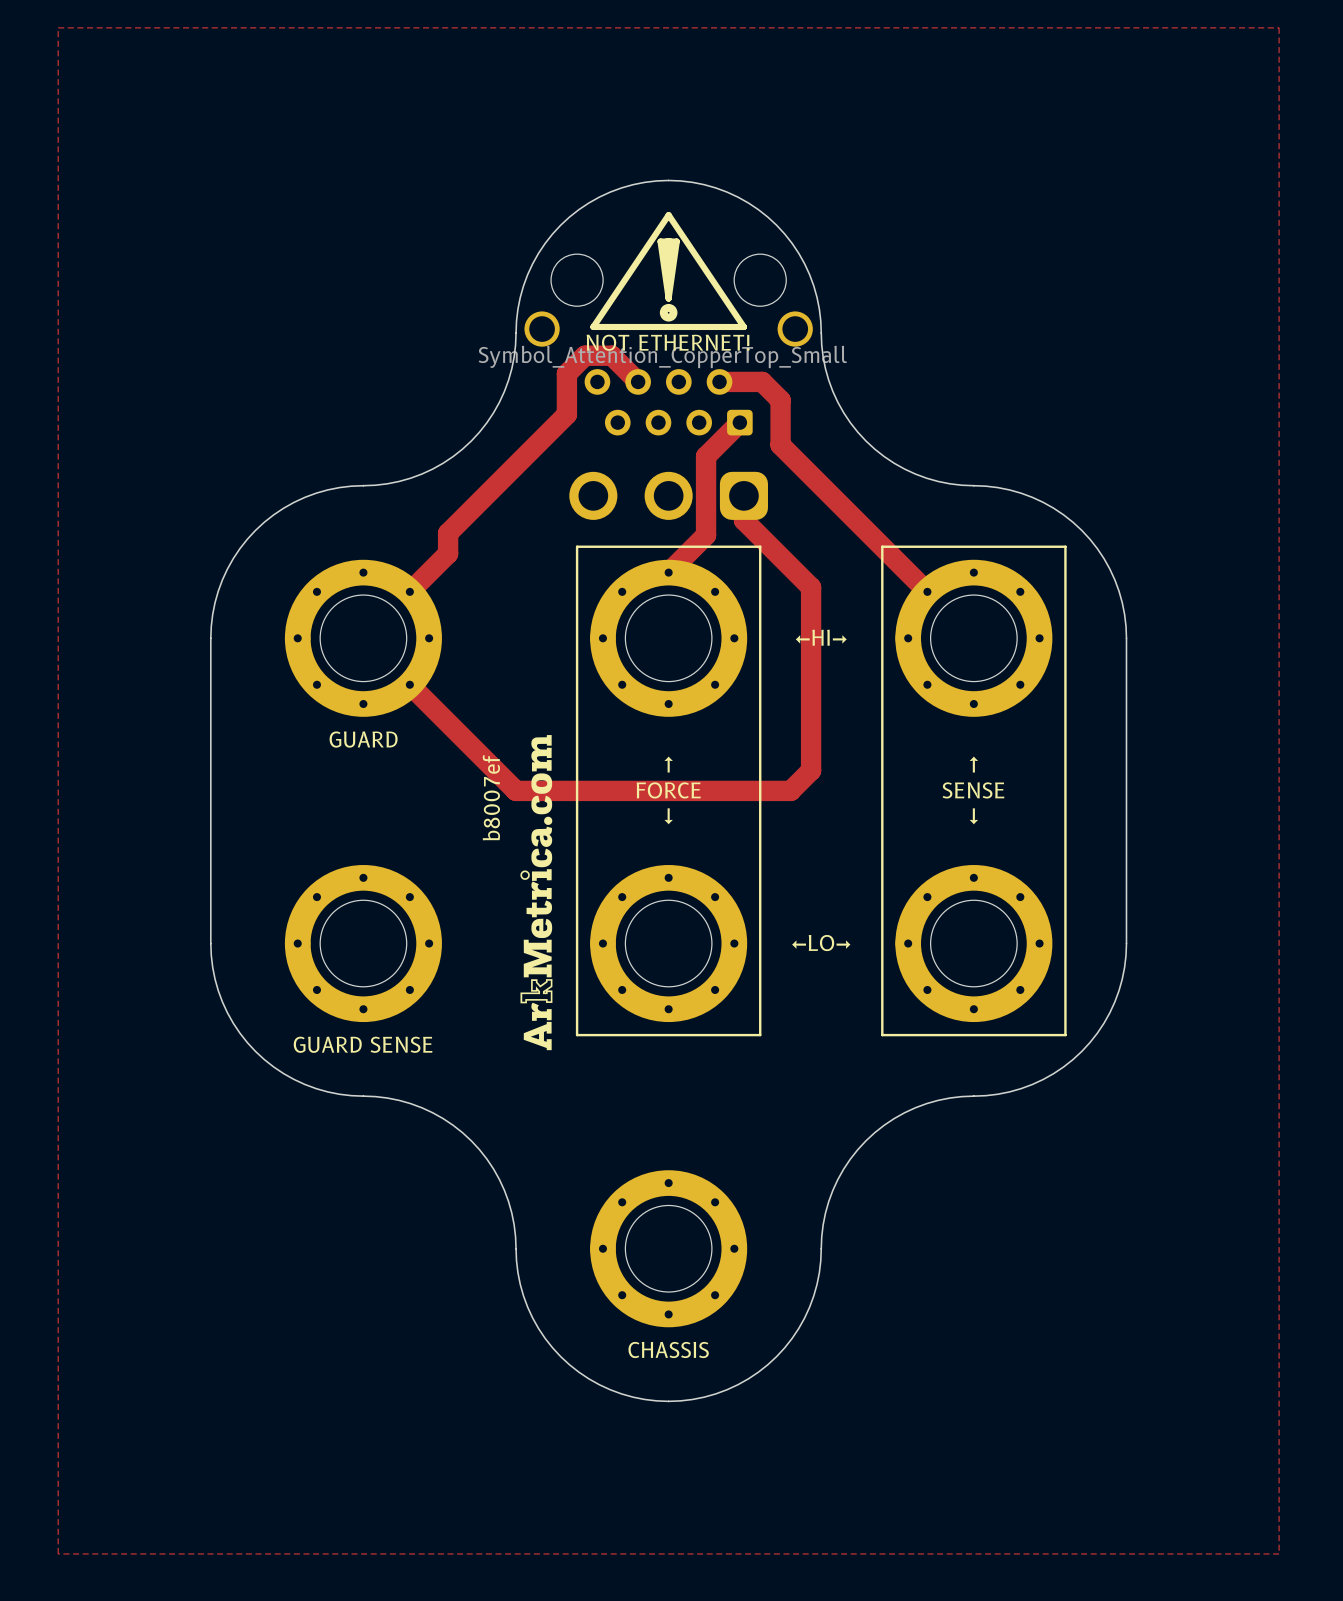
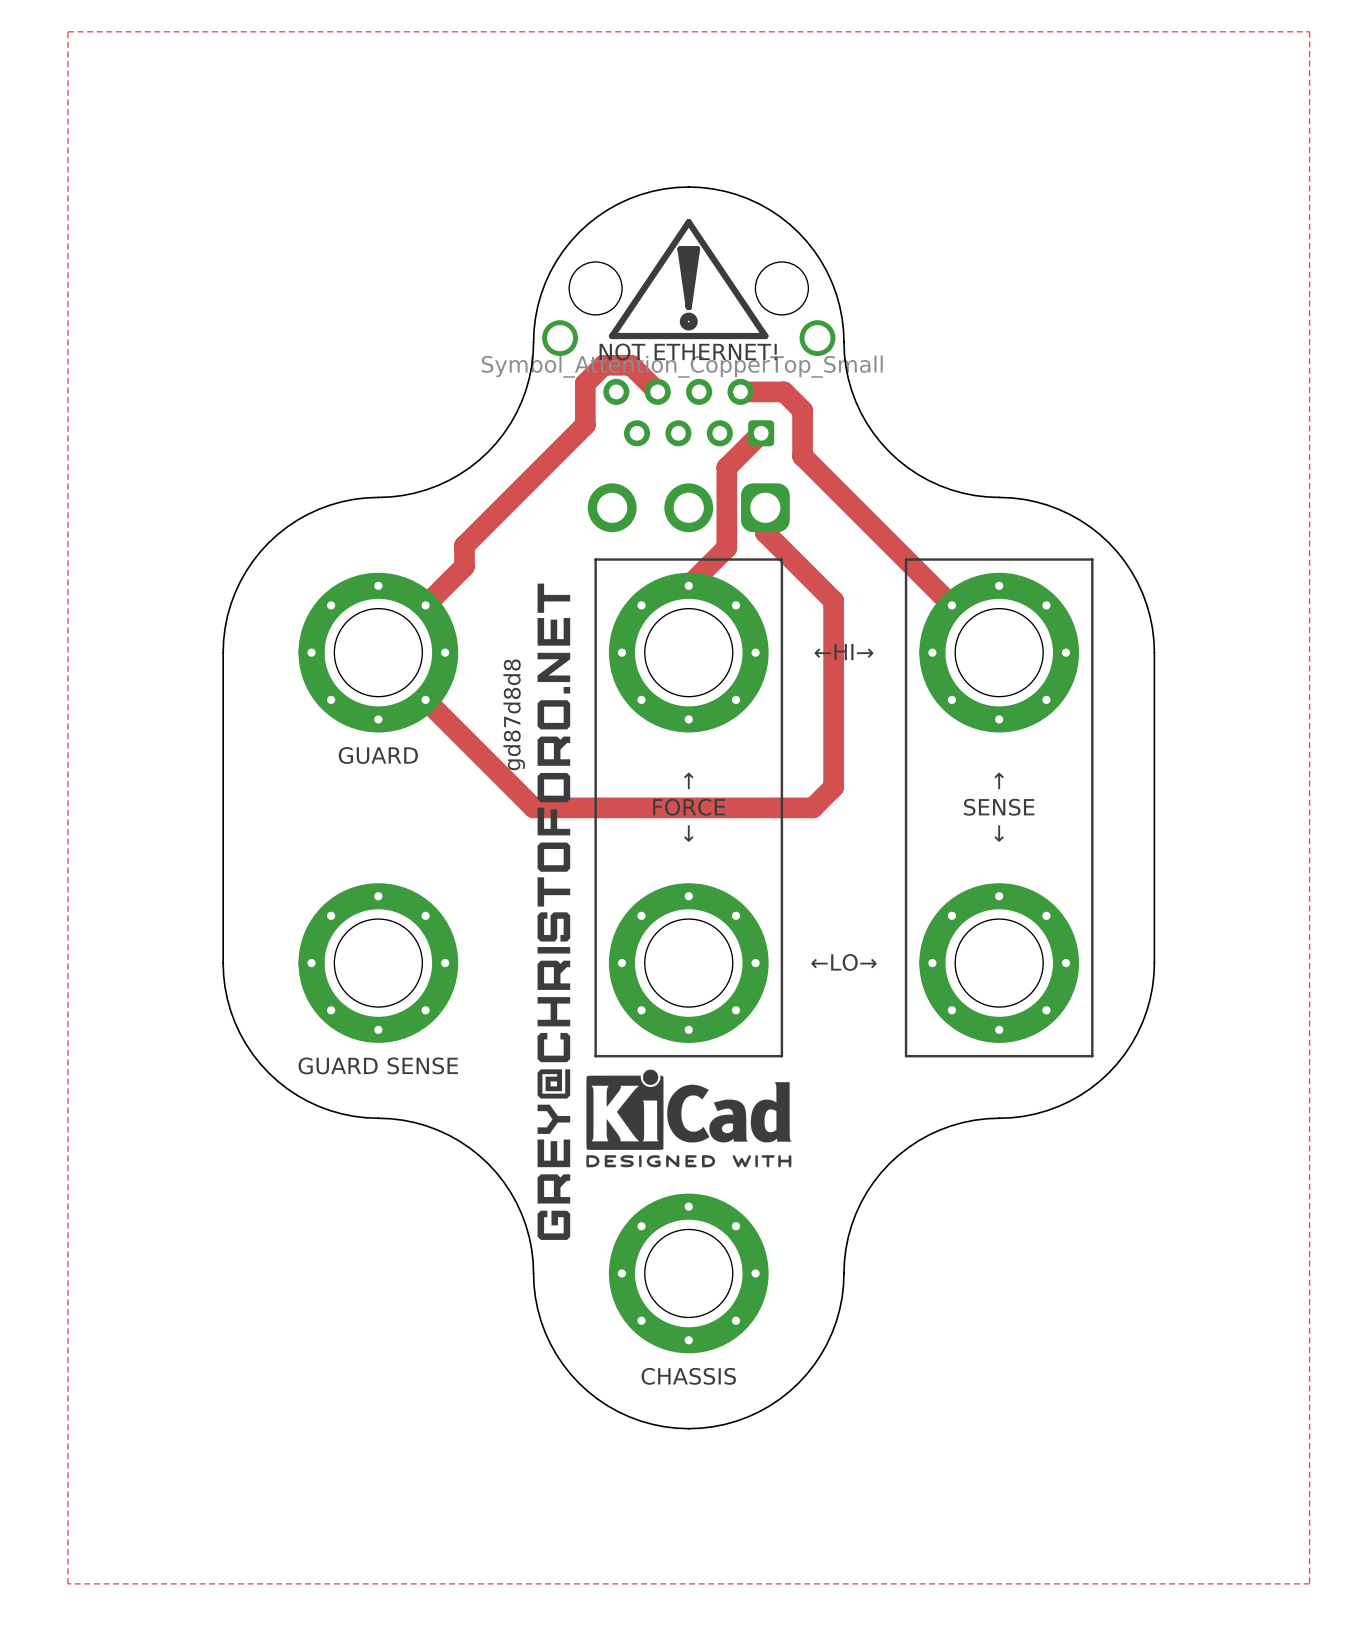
text: none -> gd87d8d8 (514, 714)
drawing shape: [520, 735, 553, 1051] -> [537, 583, 571, 1240]
text: b8007ef (491, 797) -> none
drawing: none -> [586, 1069, 792, 1168]

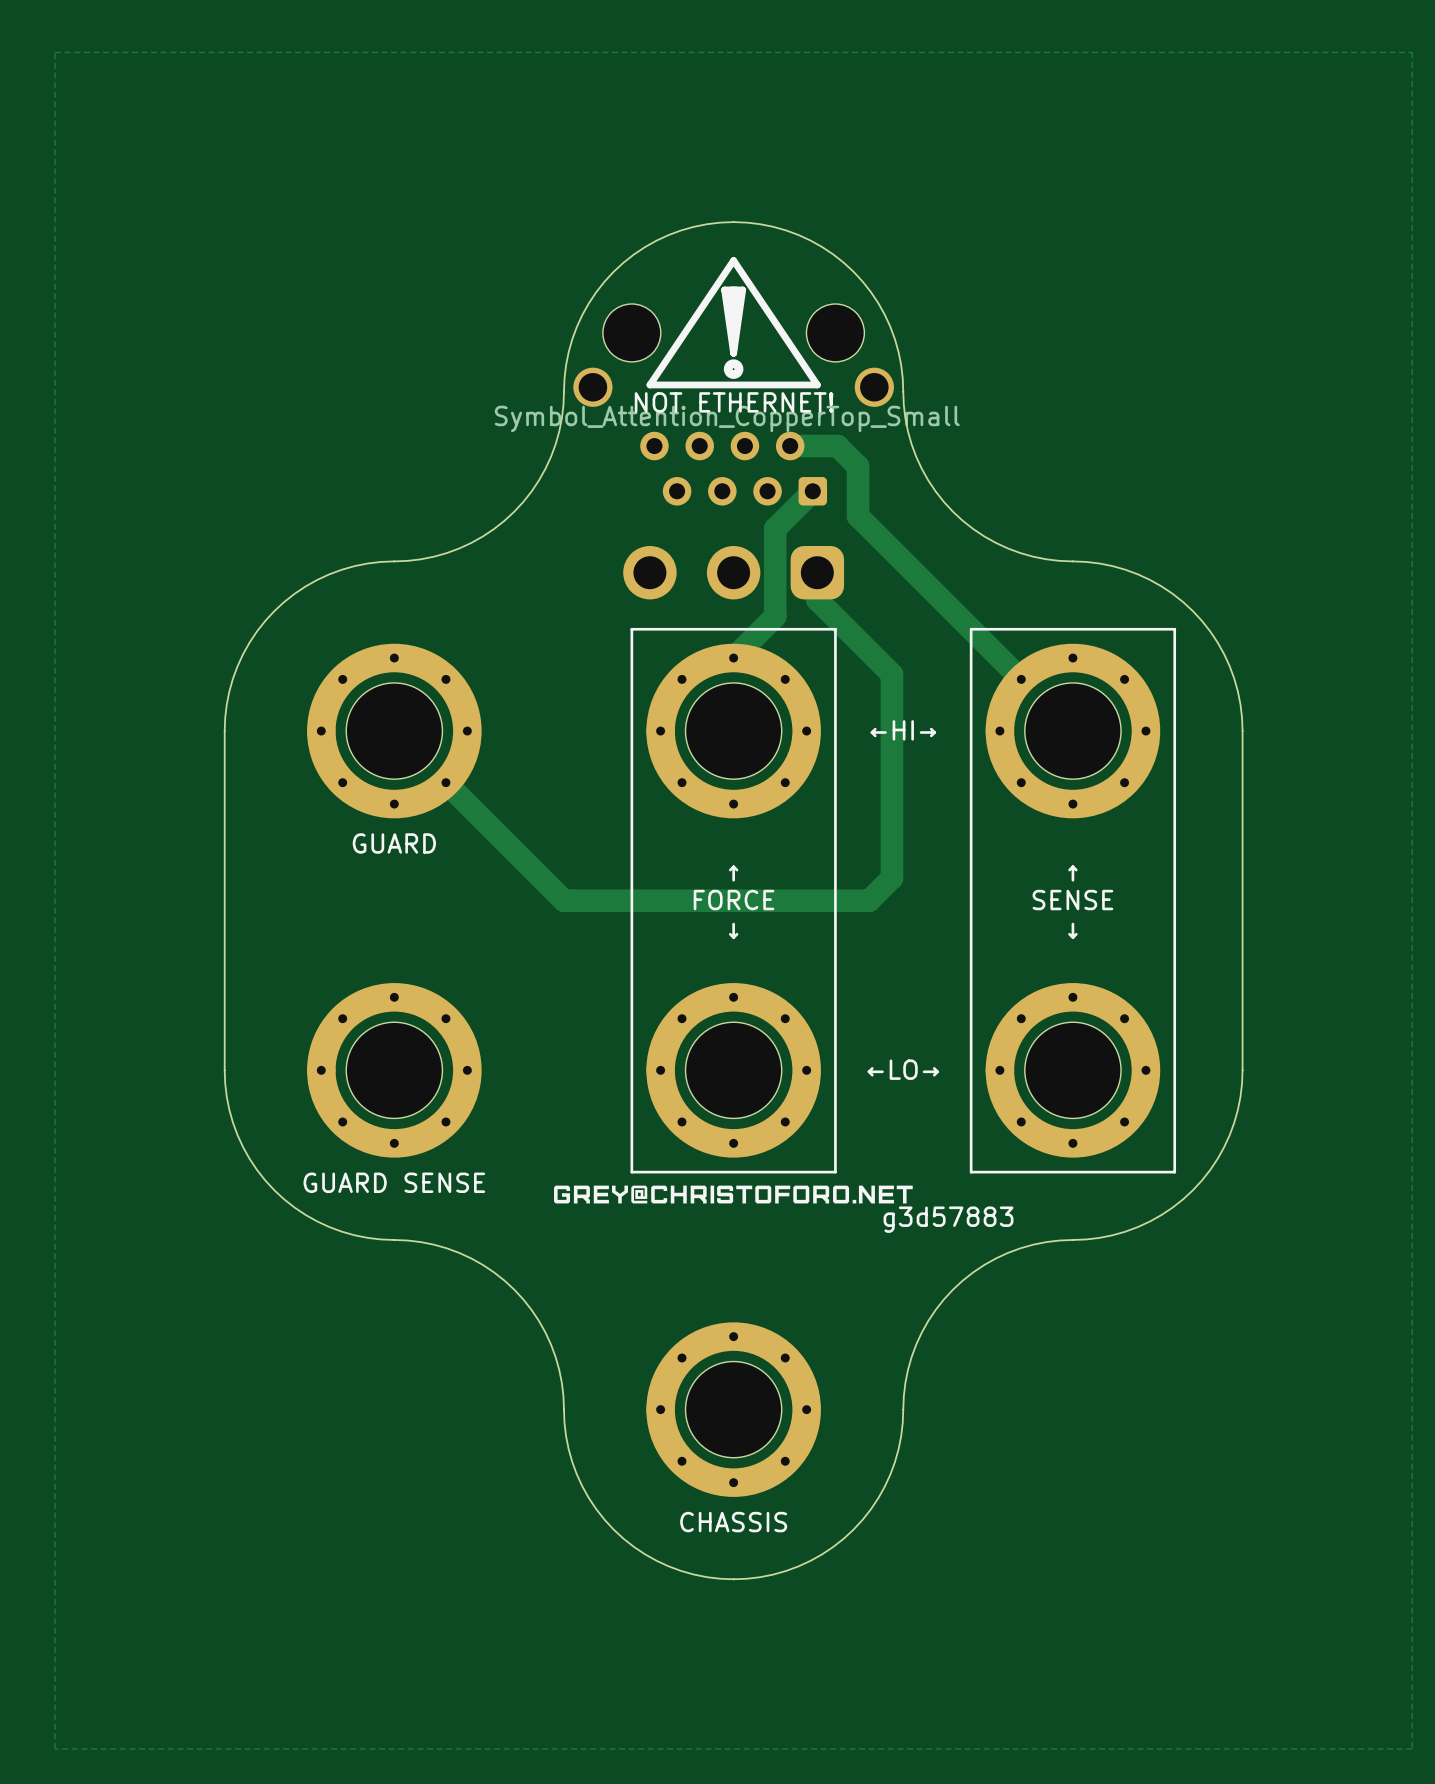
track: (657, 391) (631, 365) (603, 365) (585, 383) (585, 425) (464, 545) (464, 566) (425, 605) -> none
drawing: [537, 583, 792, 1240] -> none
text: gd87d8d8 (514, 714) -> none
drawing: none -> [554, 1185, 913, 1204]
text: none -> g3d57883 (948, 1219)

